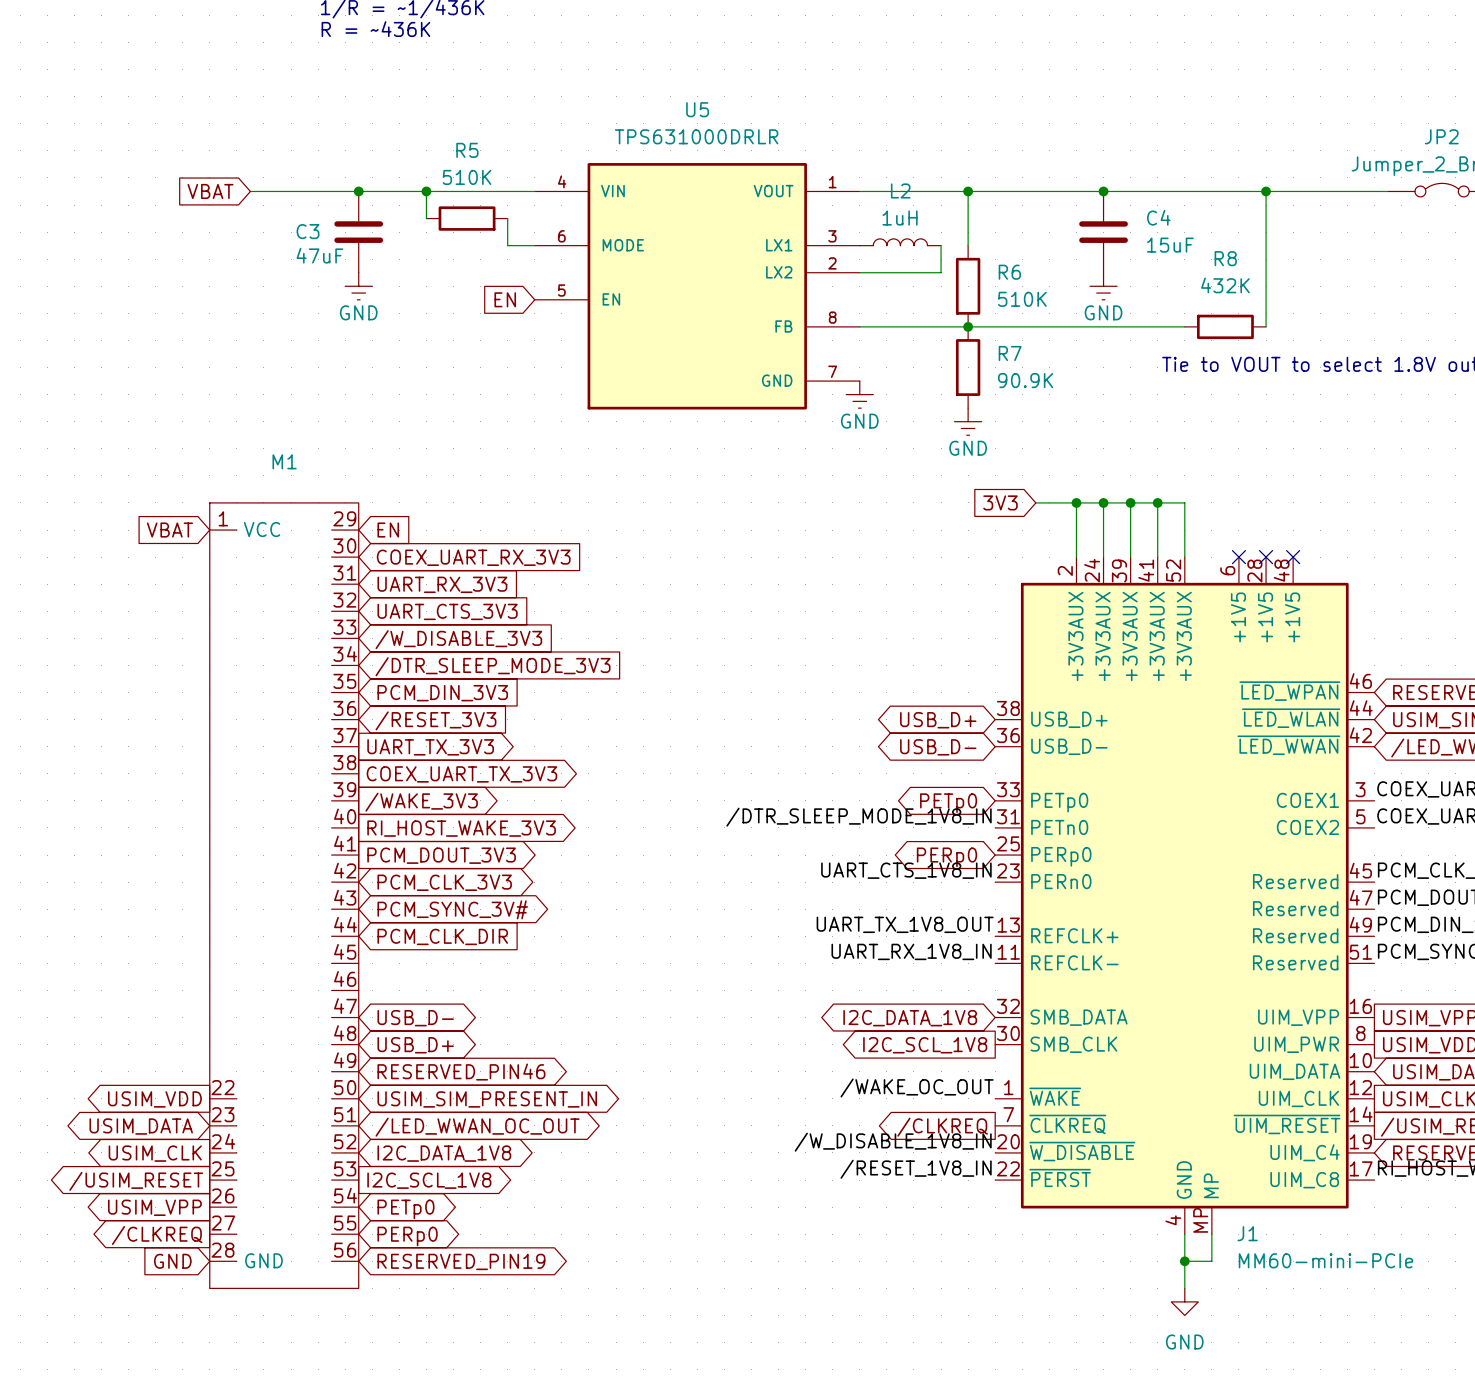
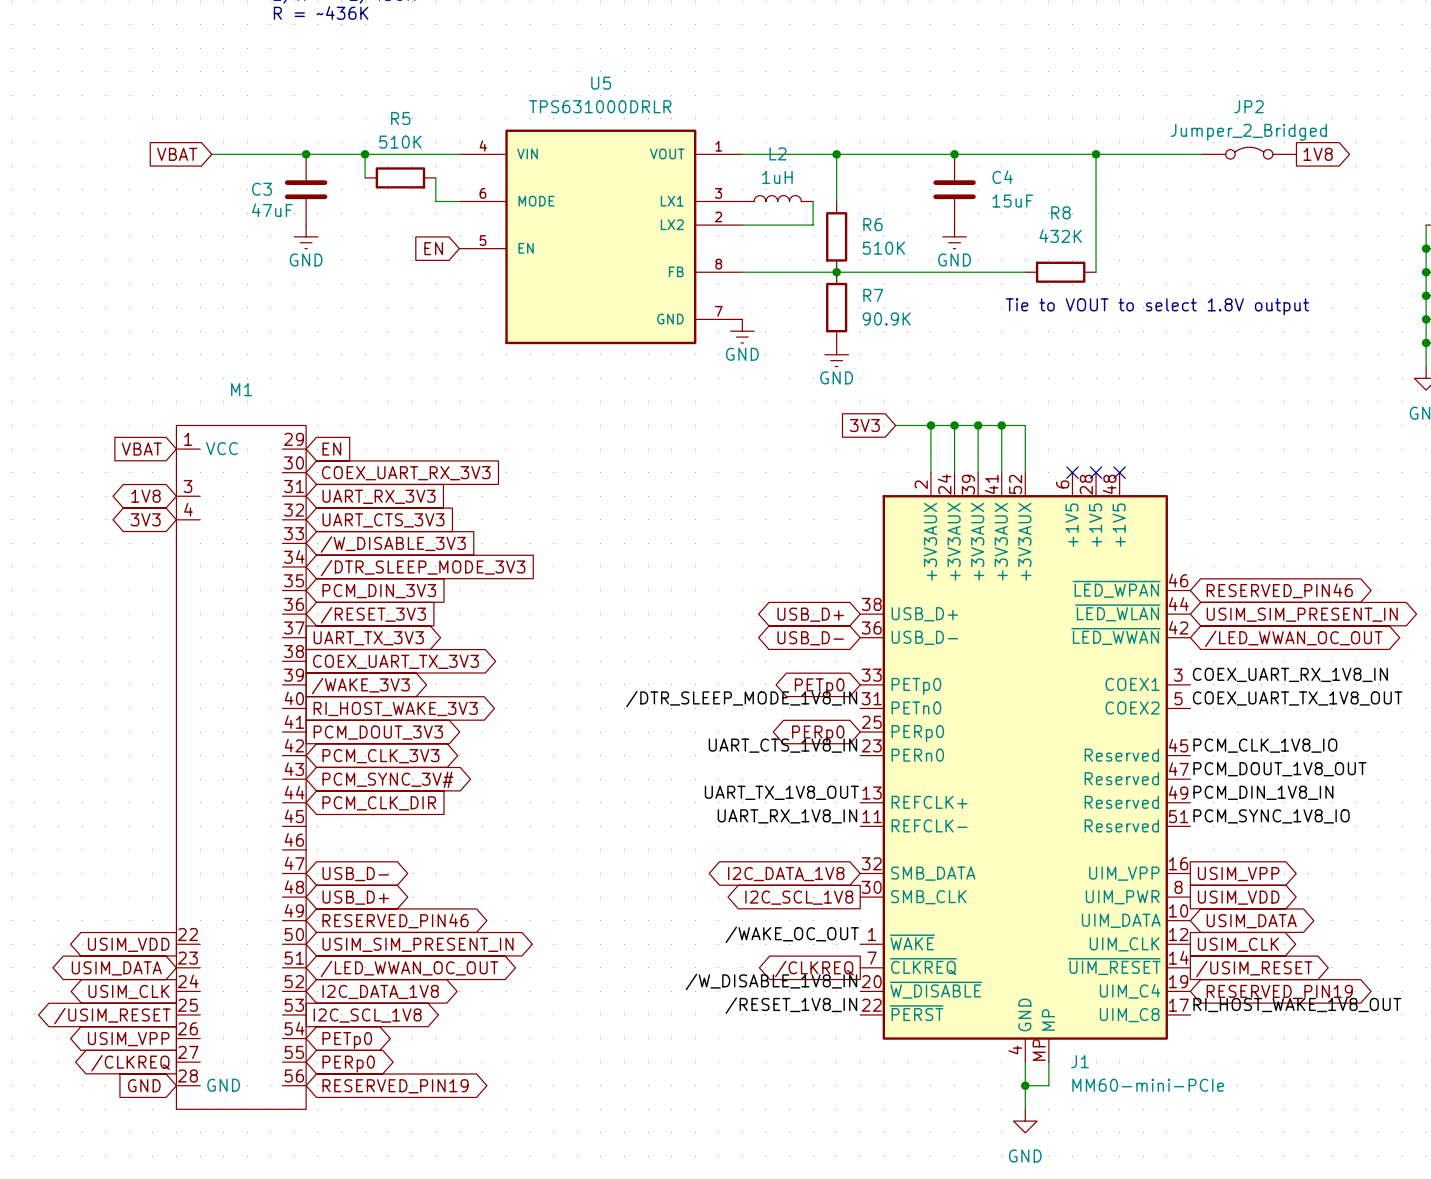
M1 symbol: [209, 502, 359, 1289] -> [176, 425, 307, 1110]
global label: none -> 1V8 (145, 496)
global label: none -> 3V3 (145, 519)

